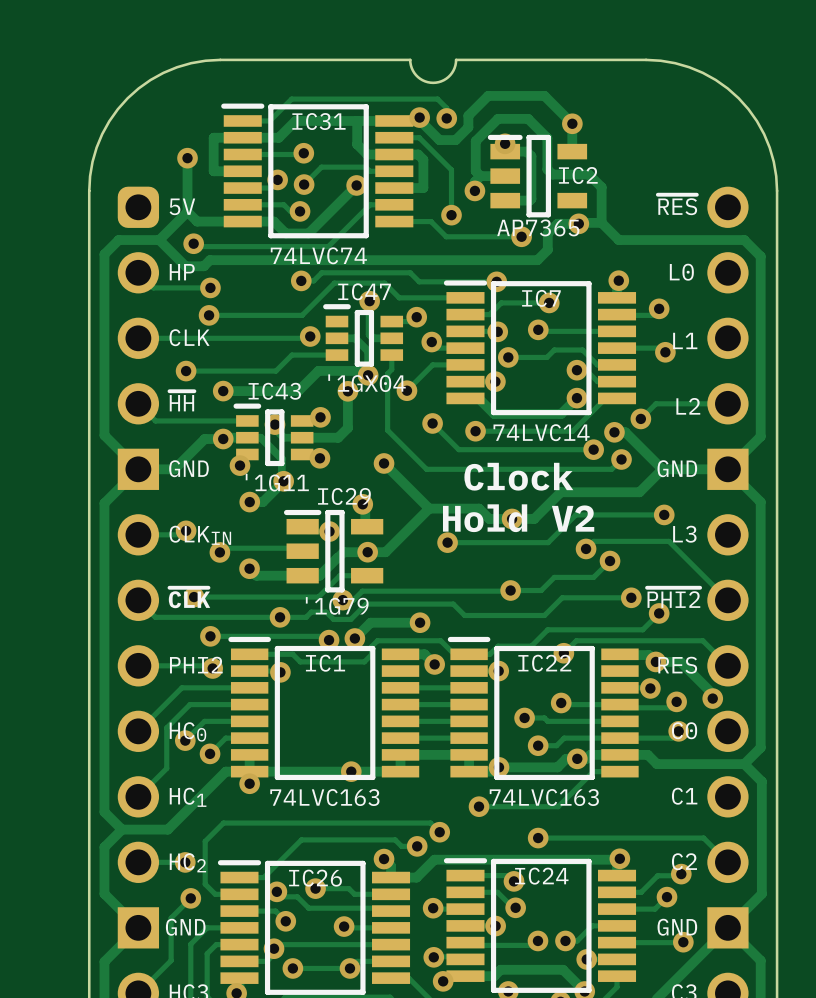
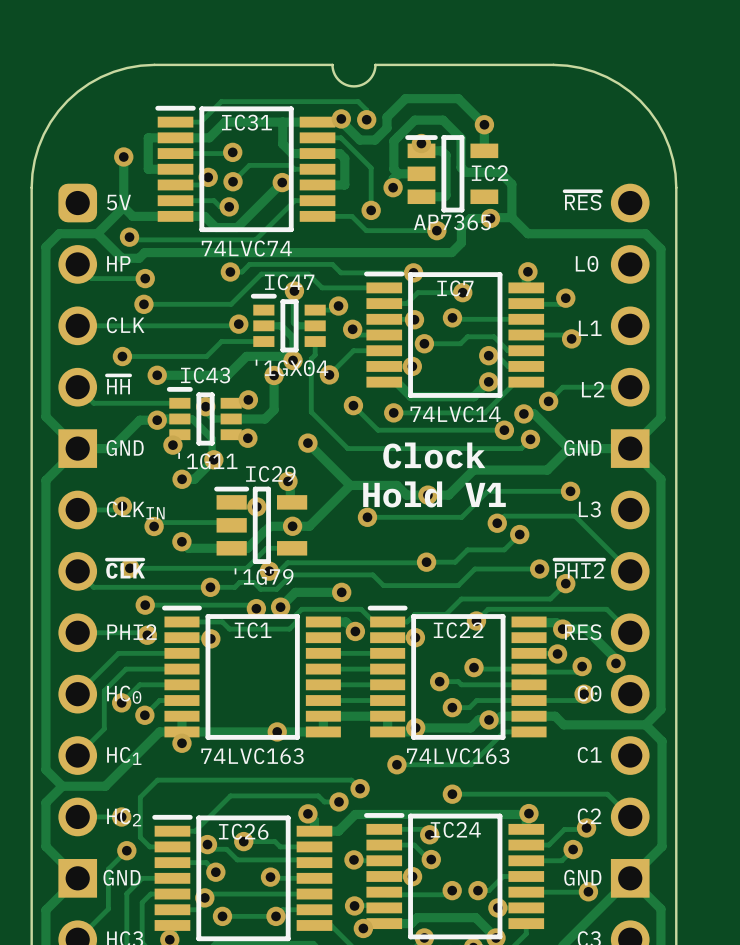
text: Hold V2 (518, 518) -> Hold V1 (434, 494)

